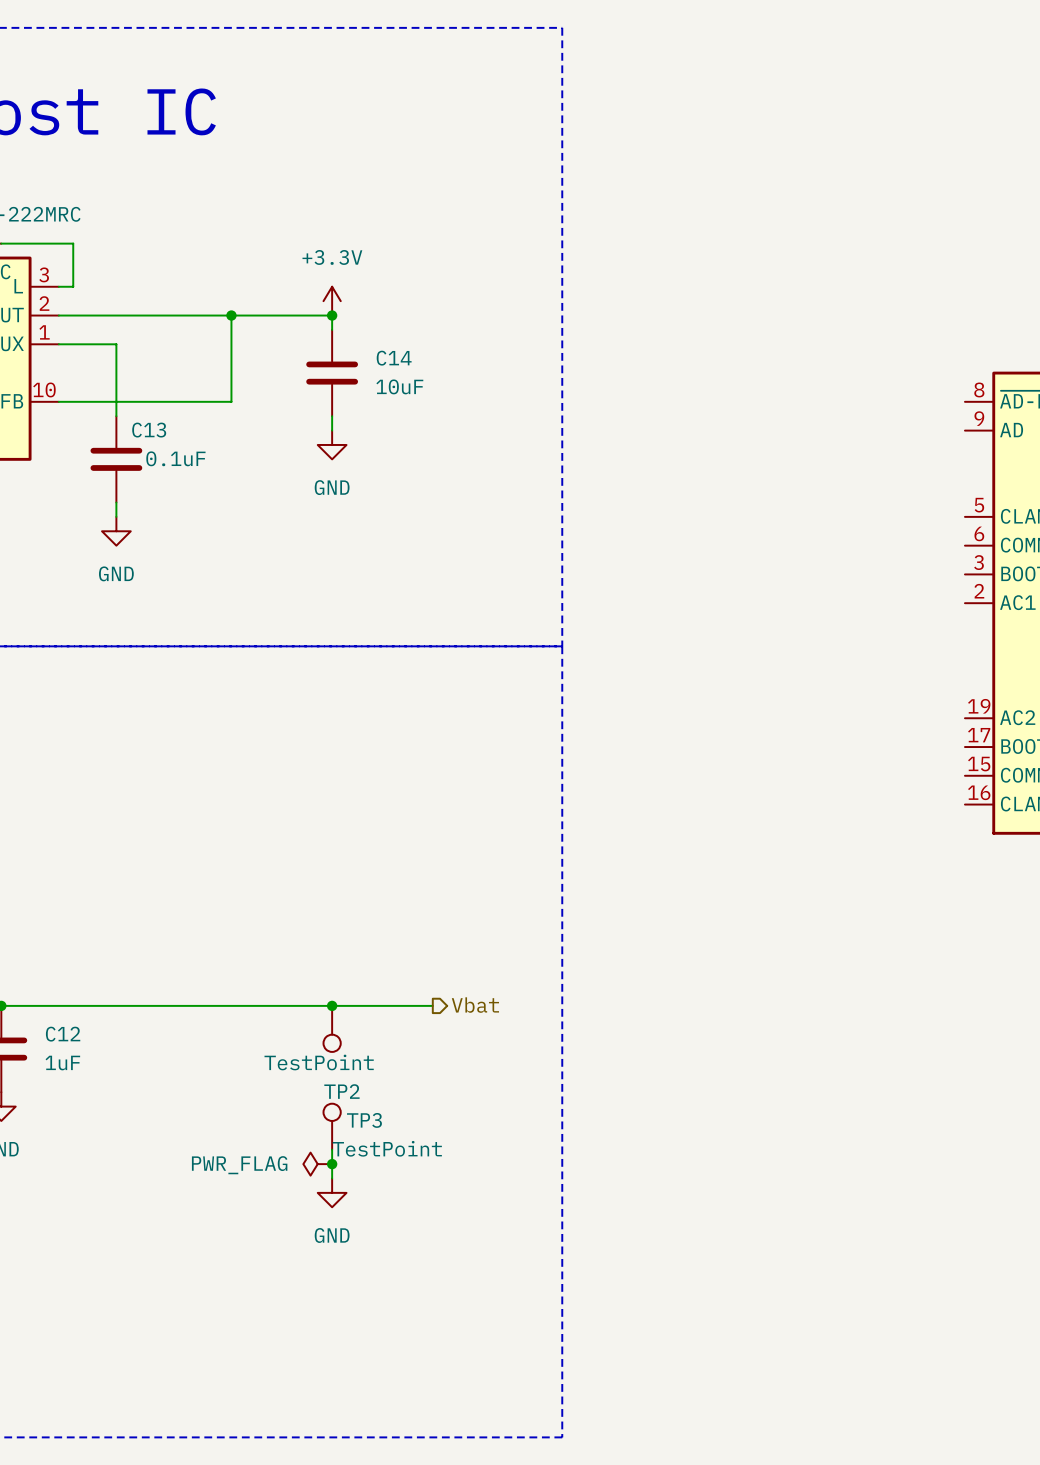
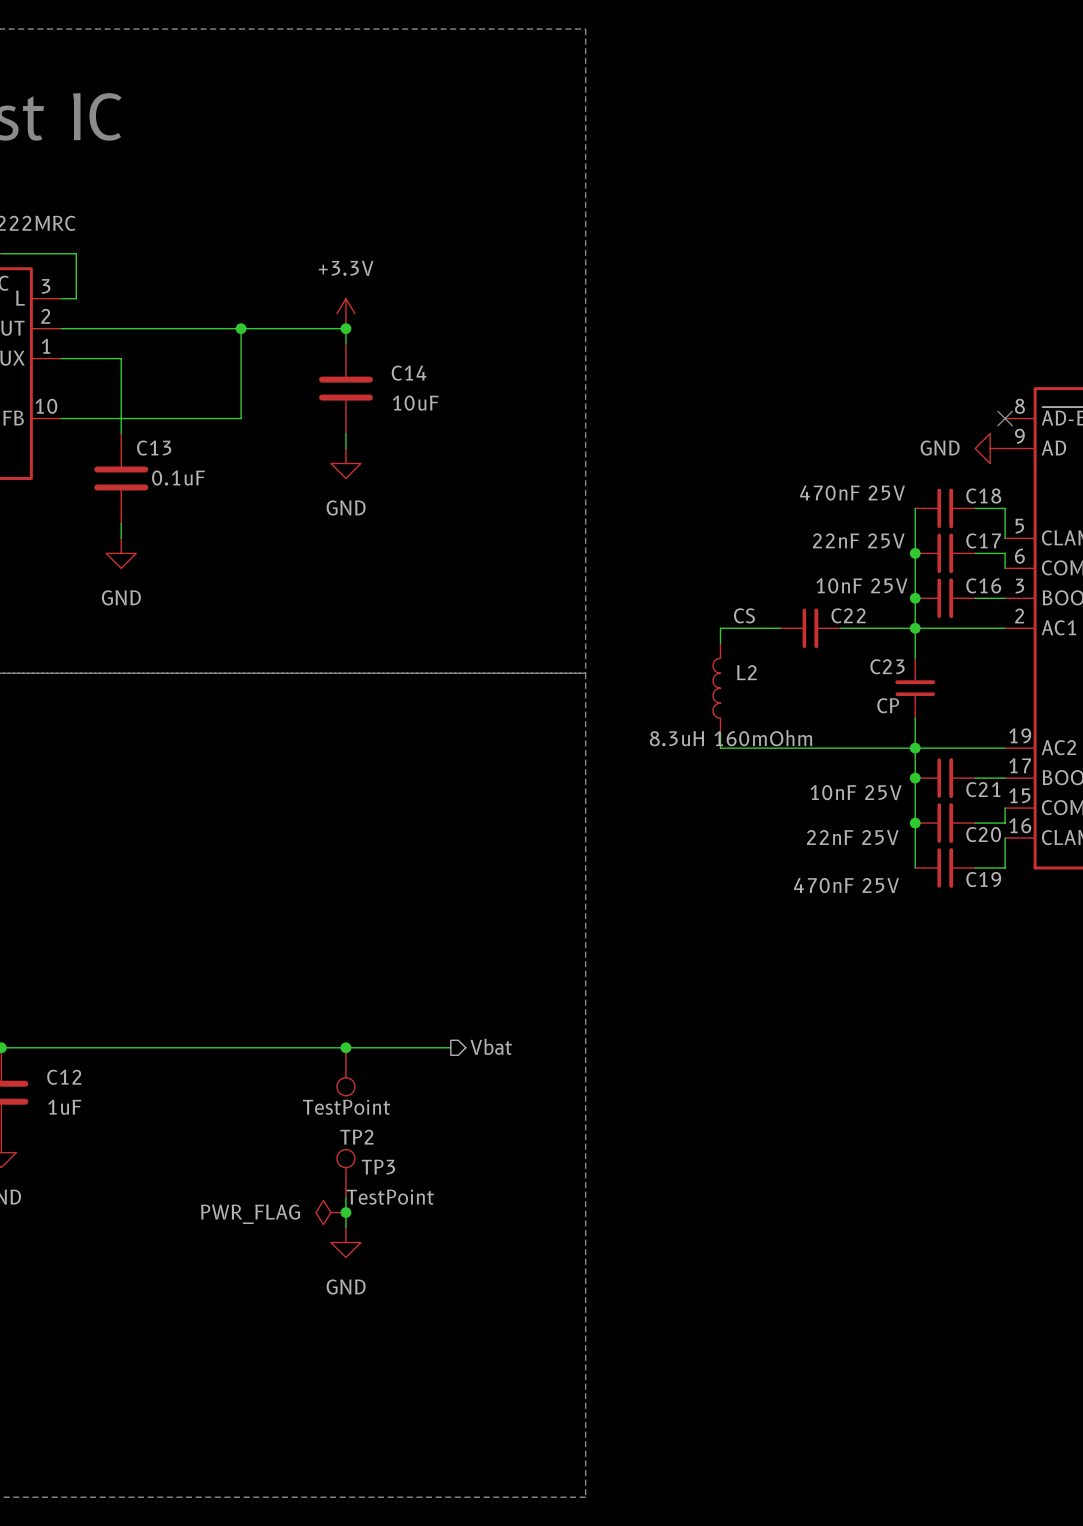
no-connect mark: none -> (1005, 418)
power symbol: none -> GND (990, 448)
wire: none -> (915, 508) (915, 658)
C18: none -> 470nF 25V (945, 508)
wire: none -> (975, 508) (1005, 508) (1005, 538)
junction: none -> (915, 553)
C17: none -> 22nF 25V (945, 553)
wire: none -> (975, 553) (1005, 553) (1005, 568)
junction: none -> (915, 598)
C16: none -> 10nF 25V (945, 598)
wire: none -> (975, 598) (1005, 598)
wire: none -> (780, 628) (720, 628) (720, 643)
C22: none -> CS (810, 628)
wire: none -> (840, 628) (1005, 628)
junction: none -> (915, 628)
L2: none -> 8.3uH 160mOhm (716, 688)
C23: none -> CP (915, 688)
wire: none -> (915, 718) (915, 868)
wire: none -> (720, 733) (720, 748) (1005, 748)
junction: none -> (915, 748)
junction: none -> (915, 778)
C21: none -> 10nF 25V (945, 778)
wire: none -> (975, 778) (1005, 778)
wire: none -> (1005, 808) (1005, 823) (975, 823)
junction: none -> (915, 823)
C20: none -> 22nF 25V (945, 823)
wire: none -> (1005, 838) (1005, 868) (975, 868)
C19: none -> 470nF 25V (945, 868)

